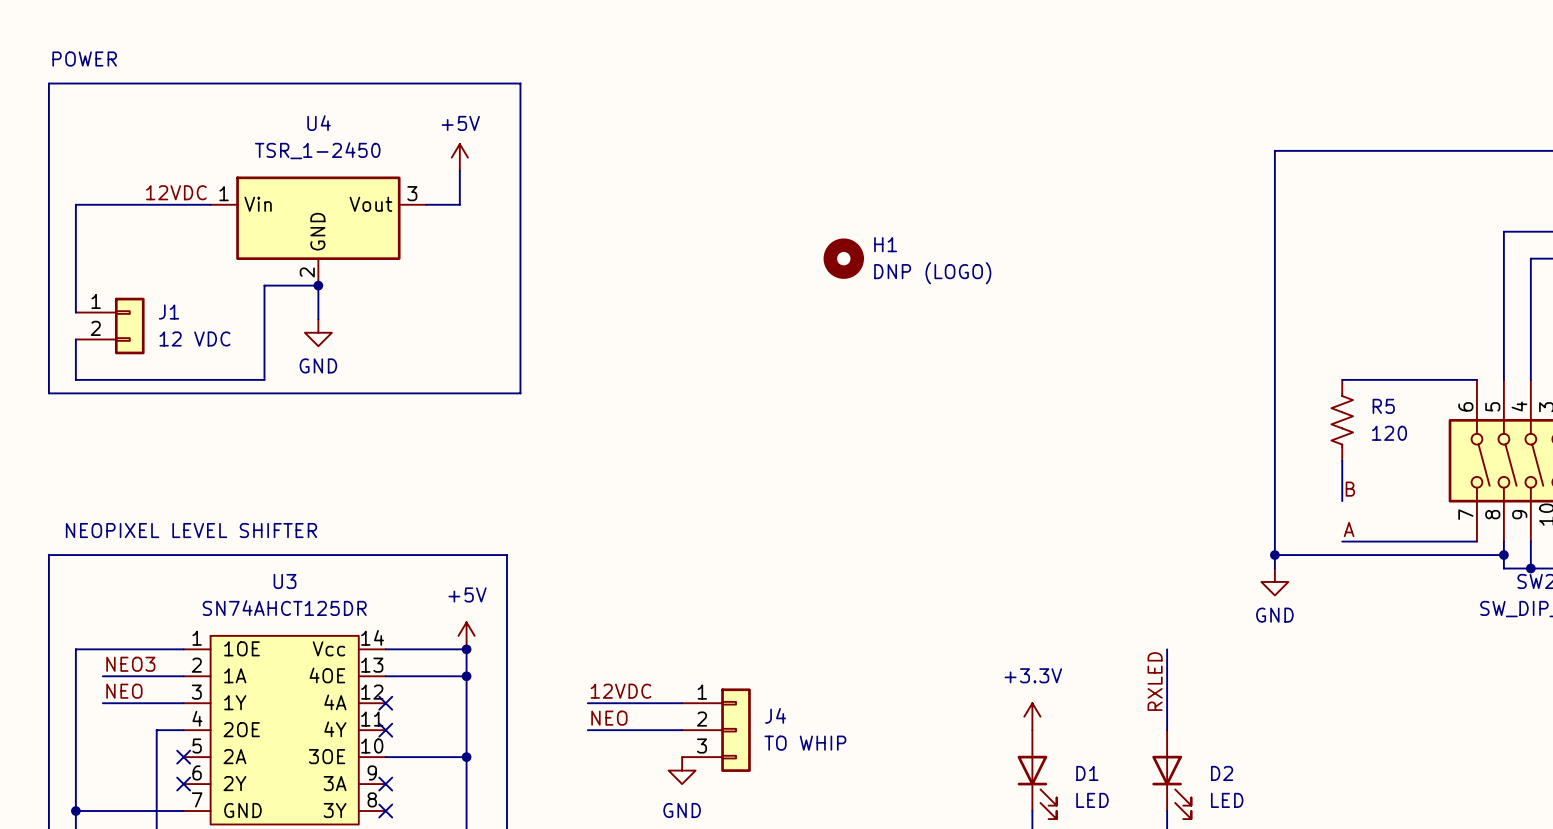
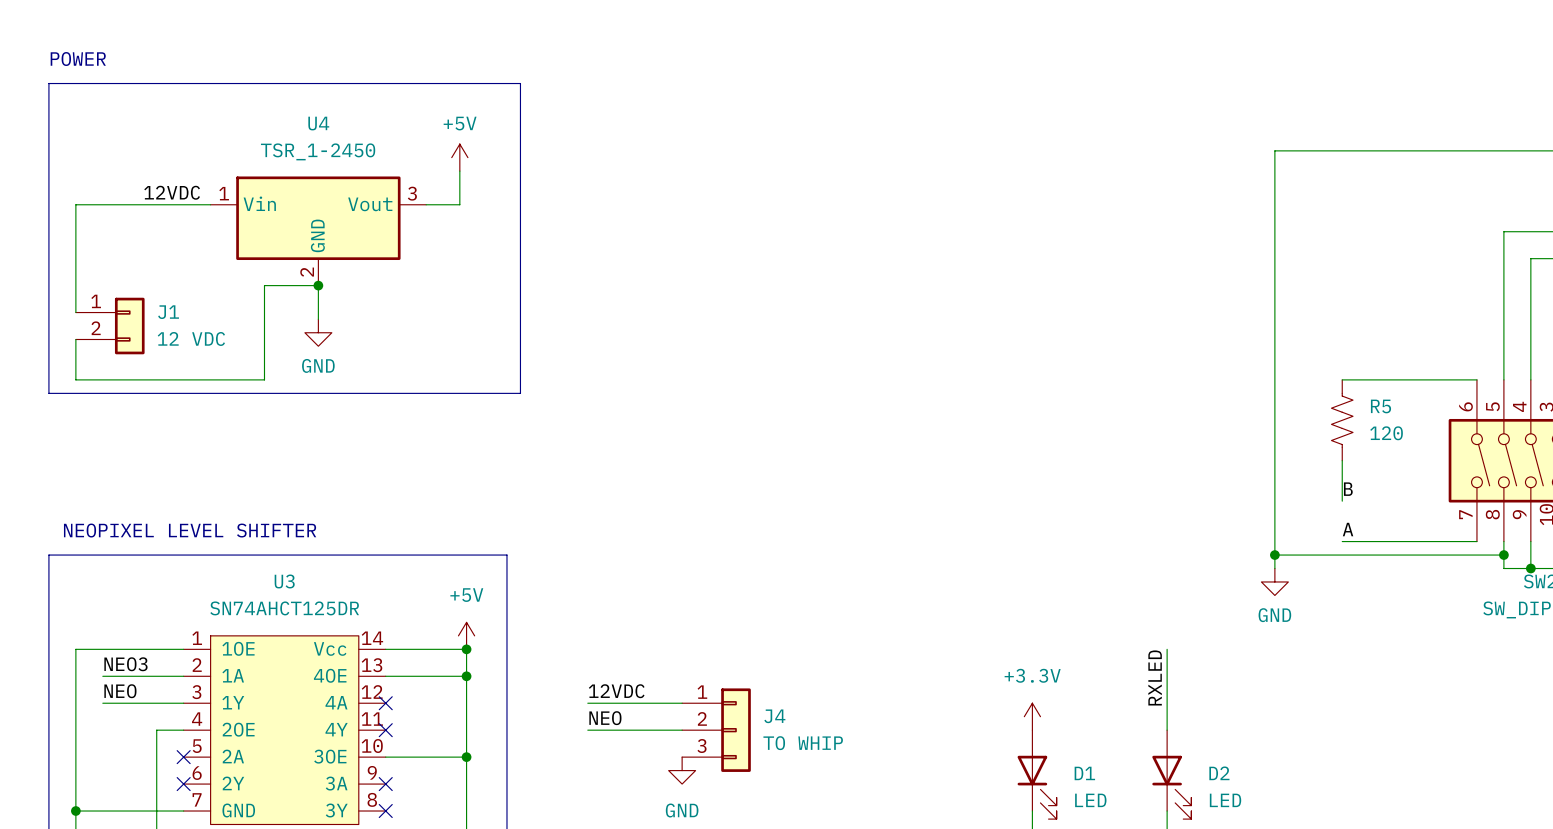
H1: DNP (LOGO) (843, 258) -> none

